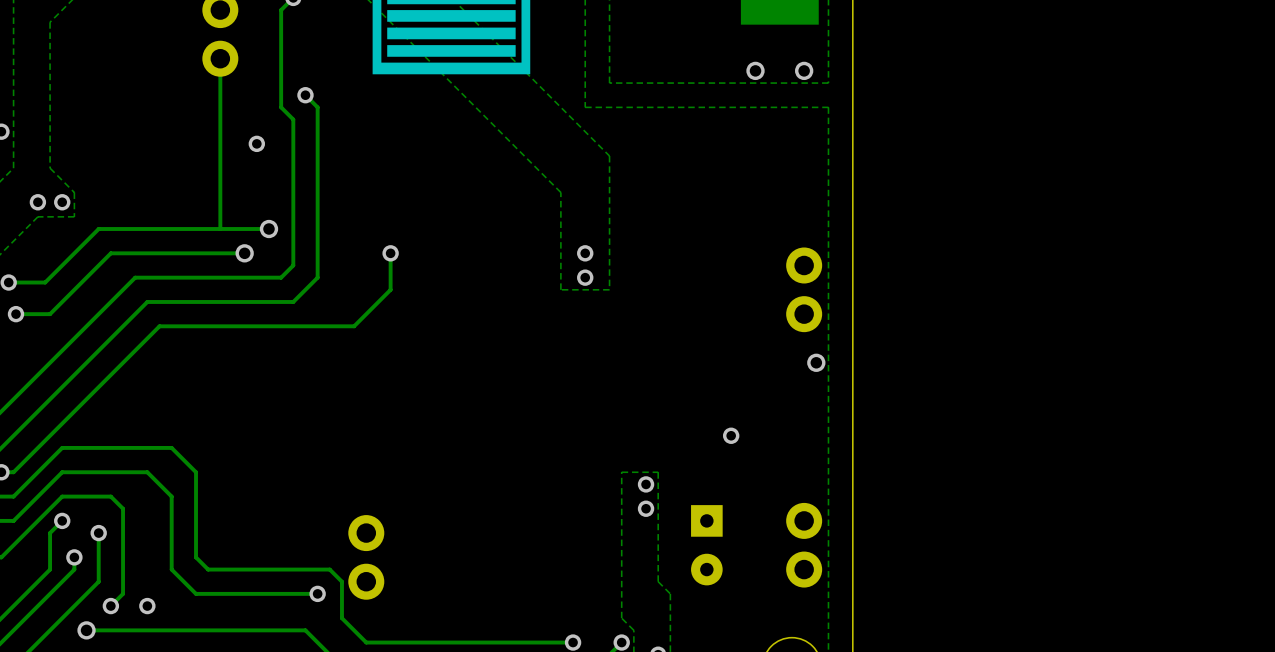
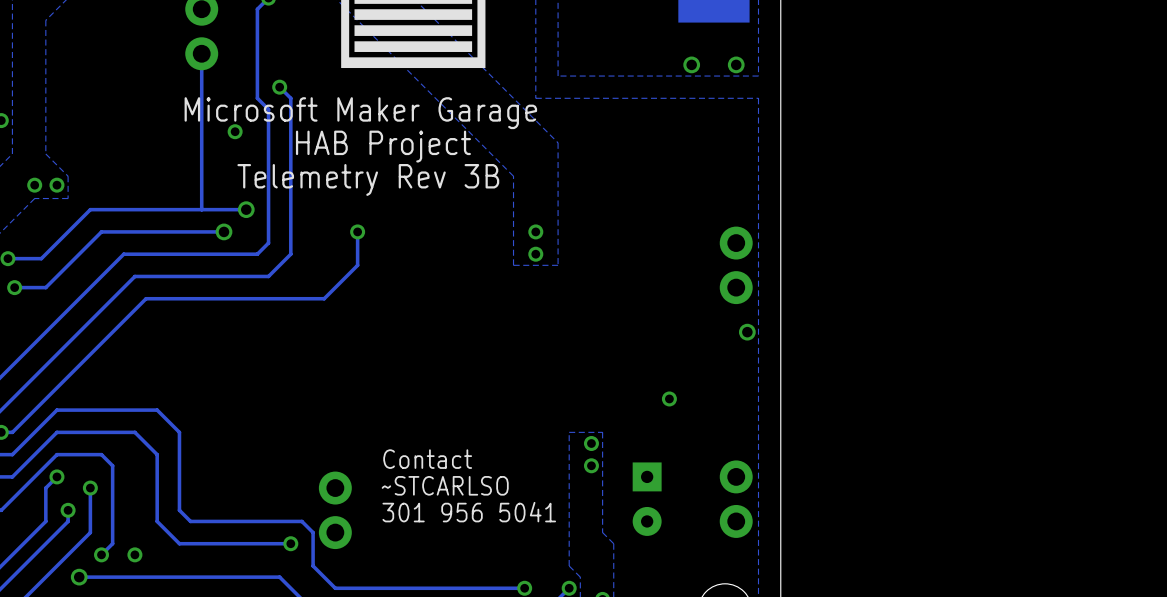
text: none -> Microsoft Maker Garage (360, 113)
text: none -> HAB Project (383, 146)
text: none -> Telemetry Rev 3B (368, 179)
text: none -> Contact (427, 459)
text: none -> ~STCARLSO (445, 485)
text: none -> 301 956 5041 (469, 512)

